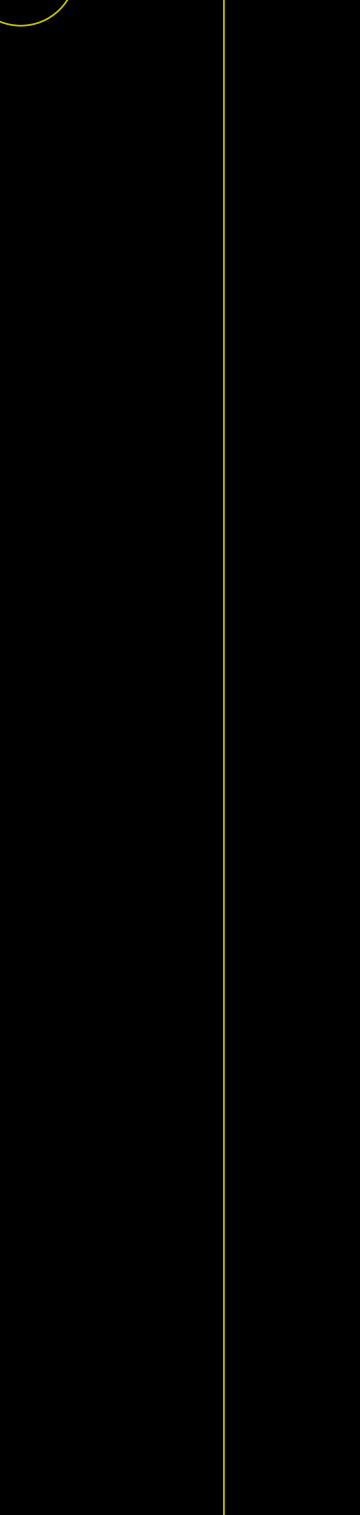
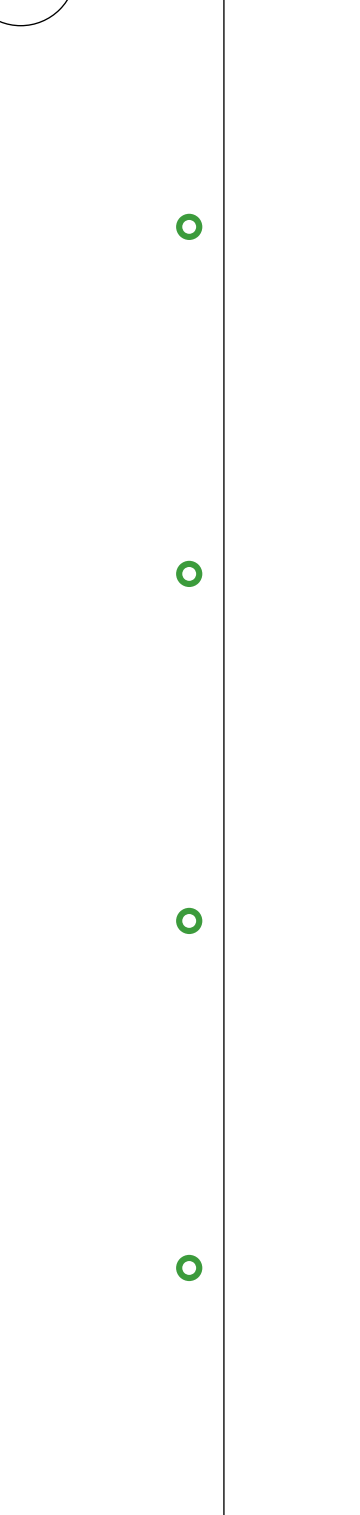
via: none -> (189, 226)
via: none -> (189, 573)
via: none -> (189, 920)
via: none -> (189, 1267)

